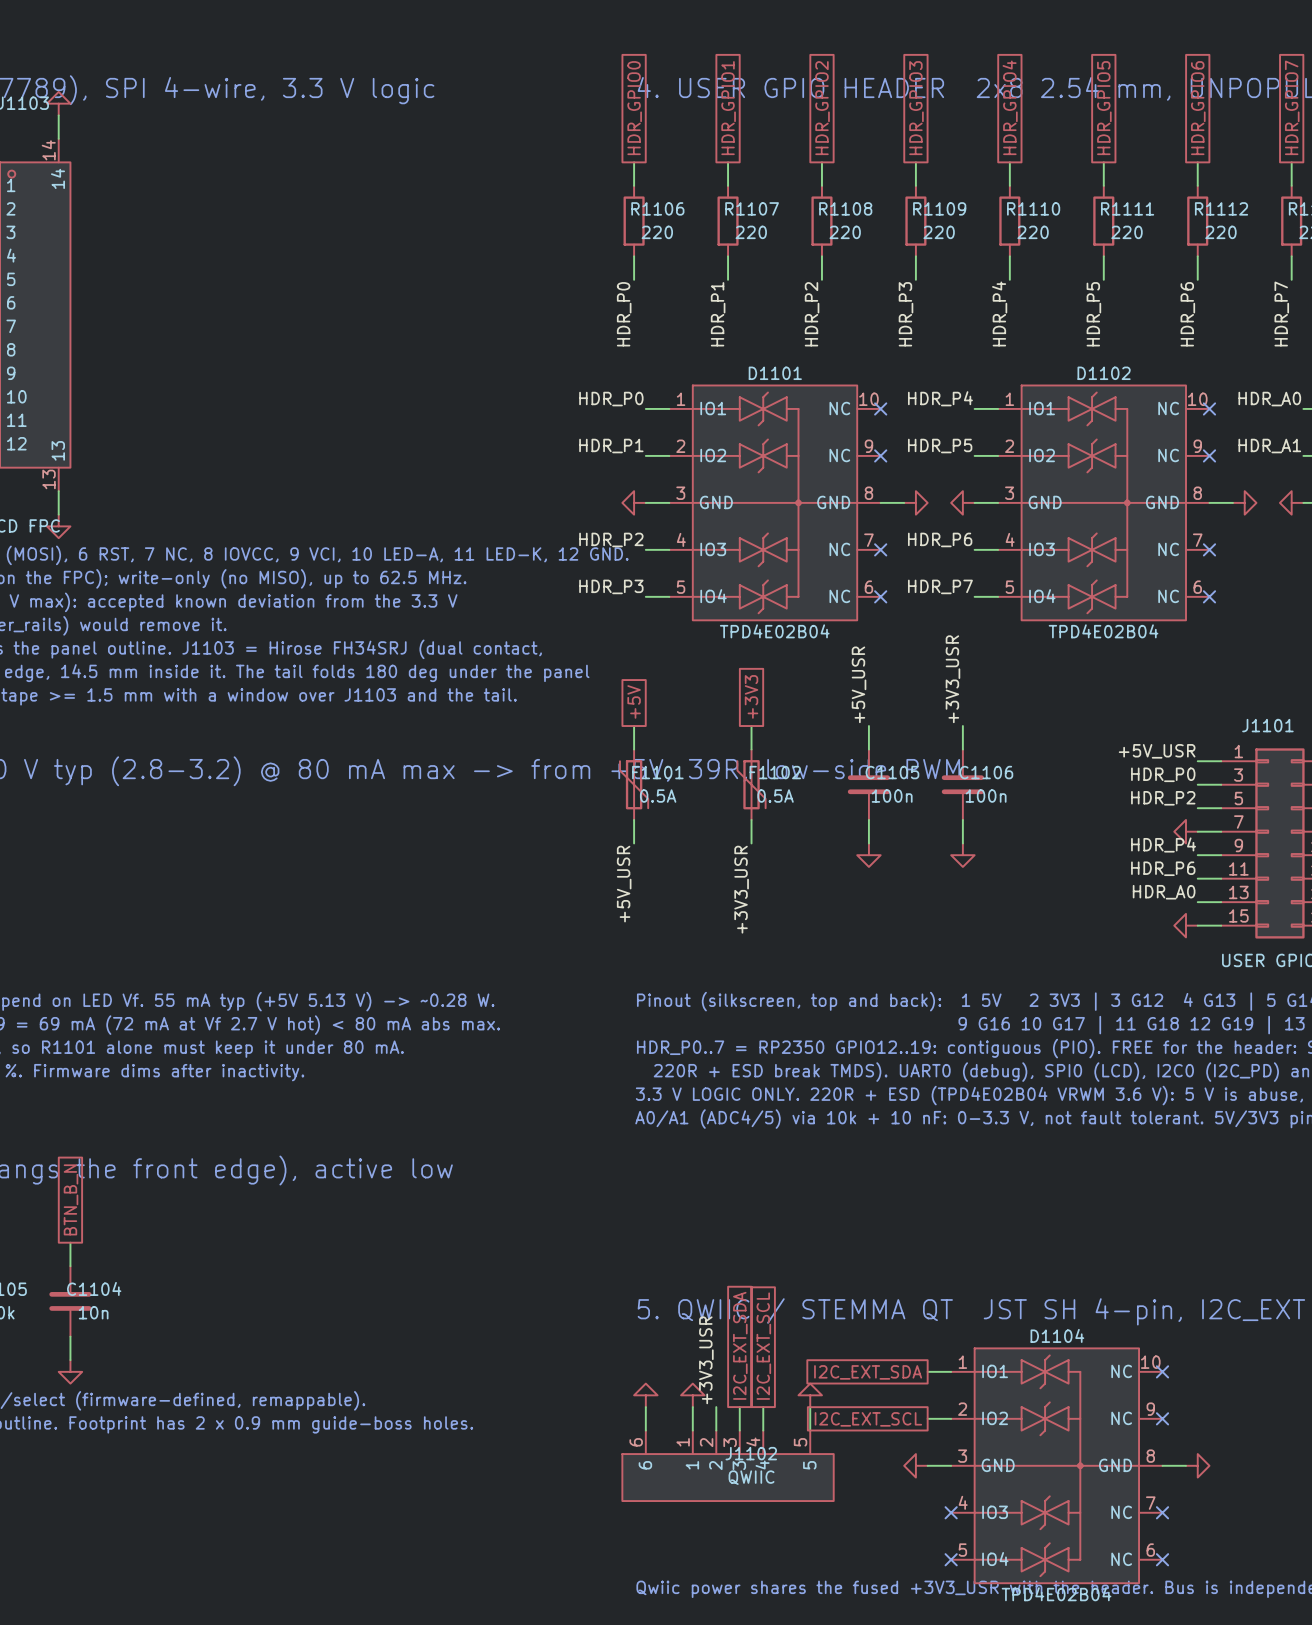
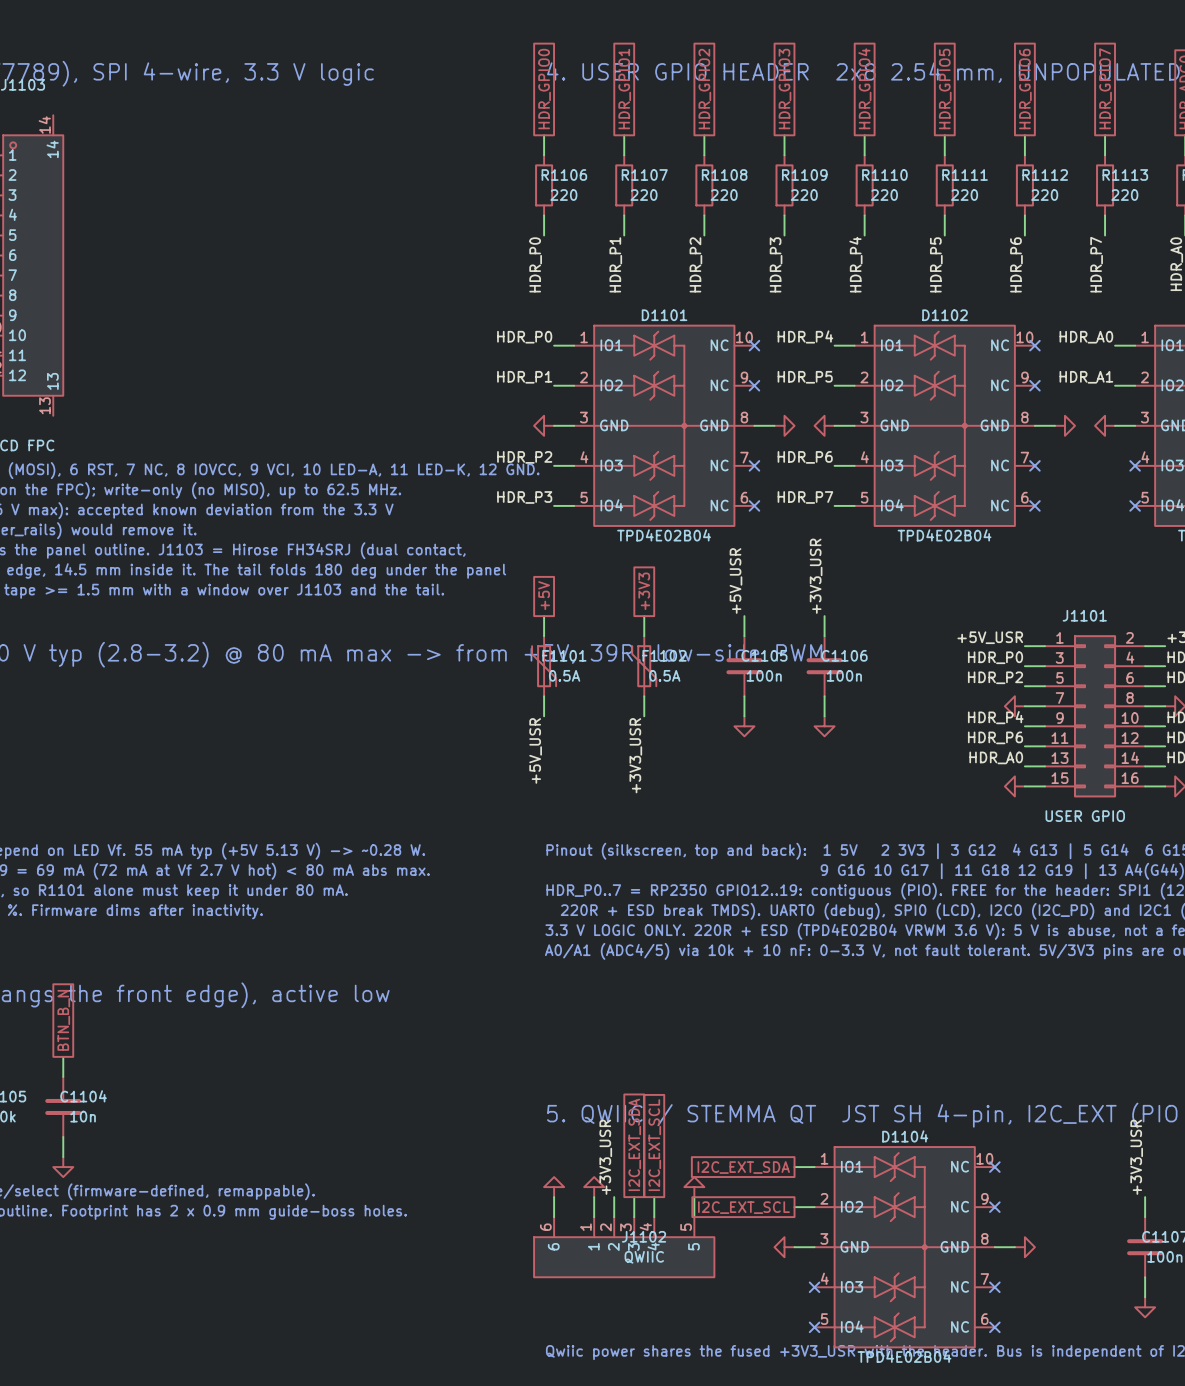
power symbol: (58, 103) -> none
wire: (58, 115) (58, 138) -> none
wire: (58, 491) (58, 514) -> none
power symbol: (58, 526) -> none

